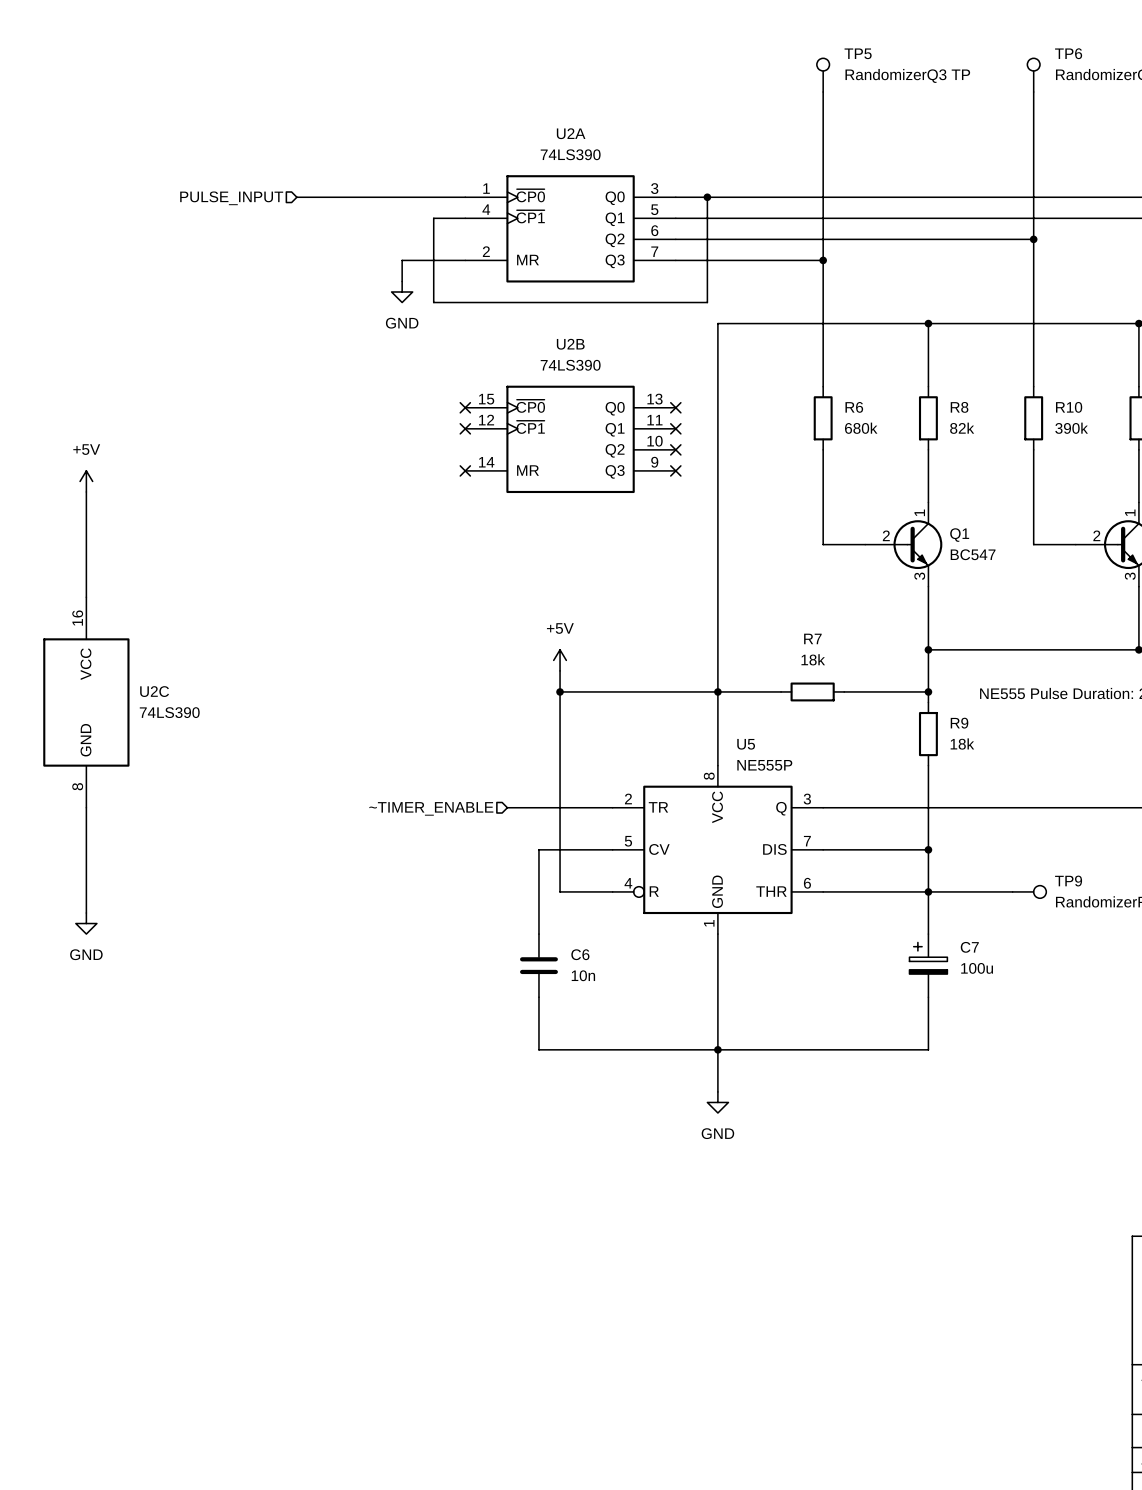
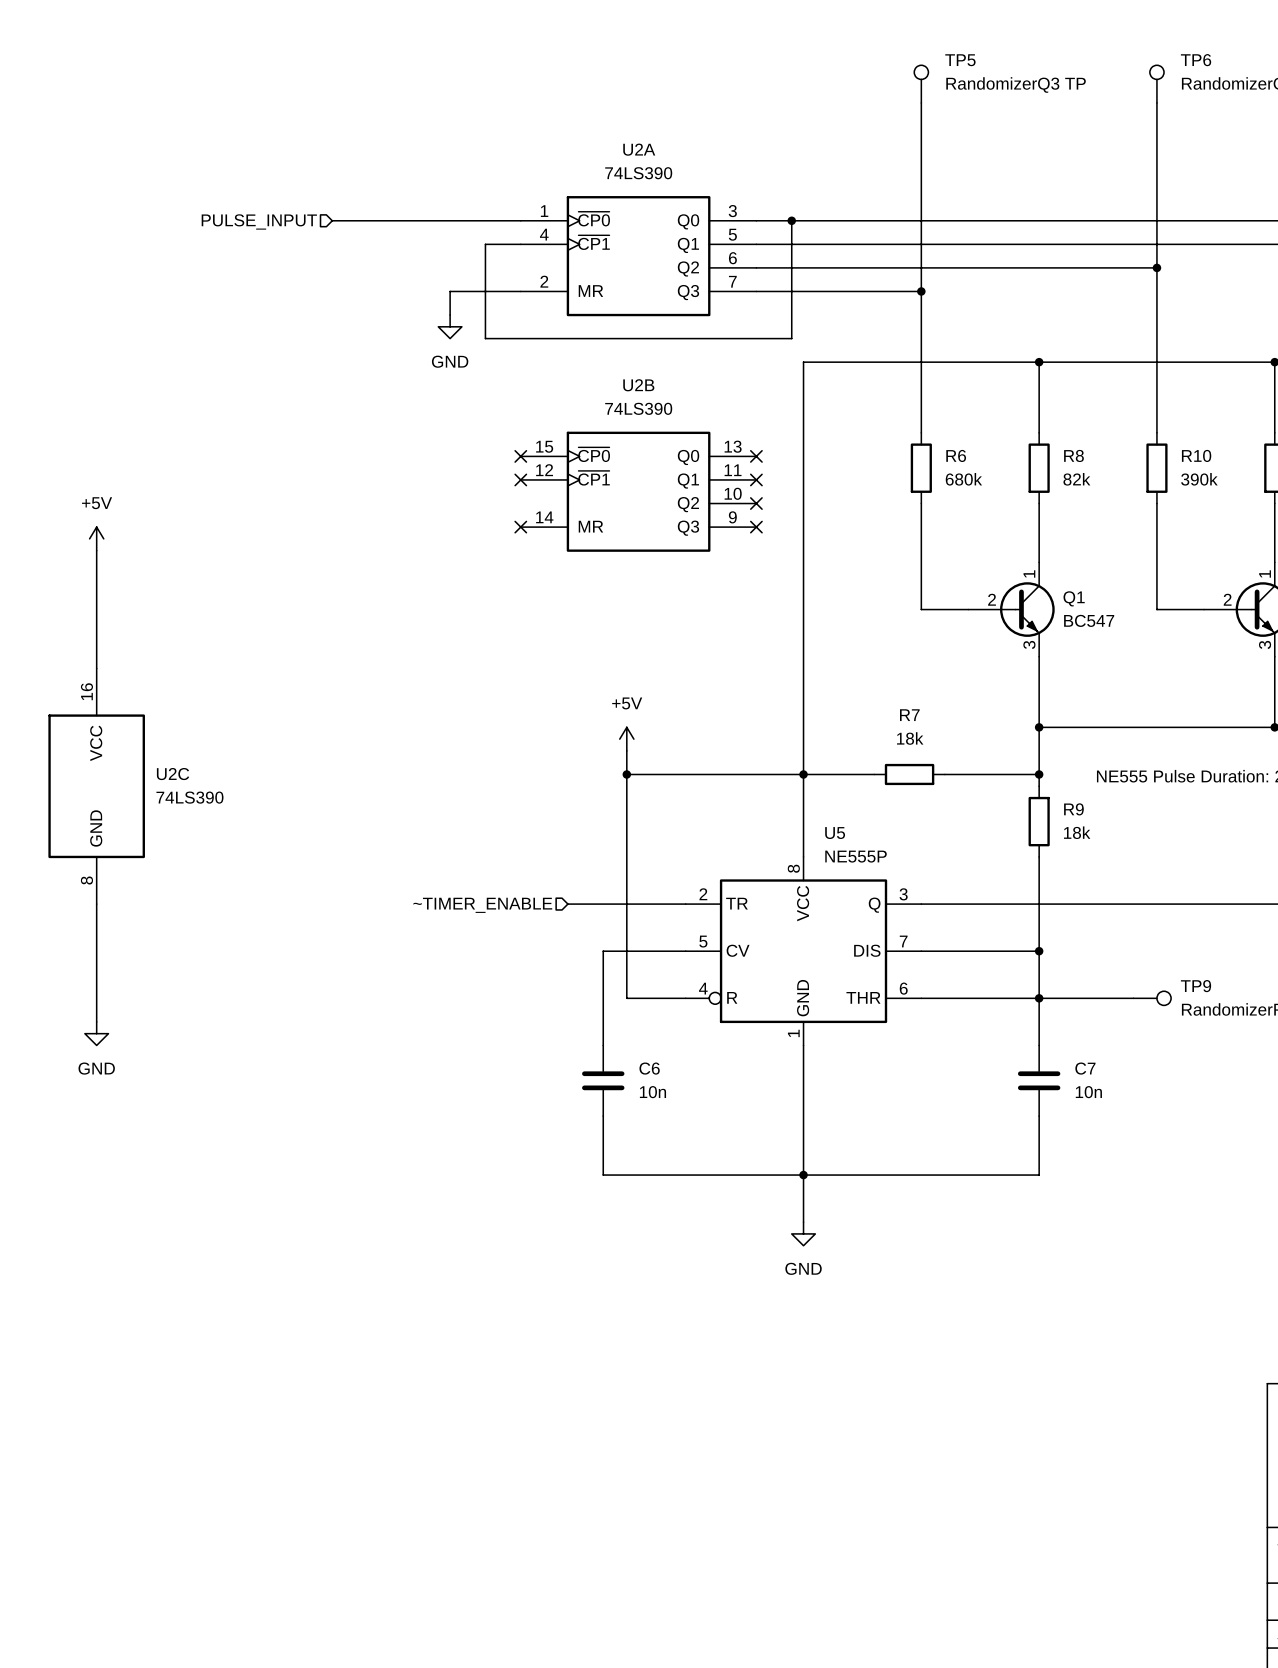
C7 symbol: [909, 934, 948, 998] -> [1017, 1045, 1061, 1117]
C7 value: 100u (977, 968) -> 10n (1088, 1092)

